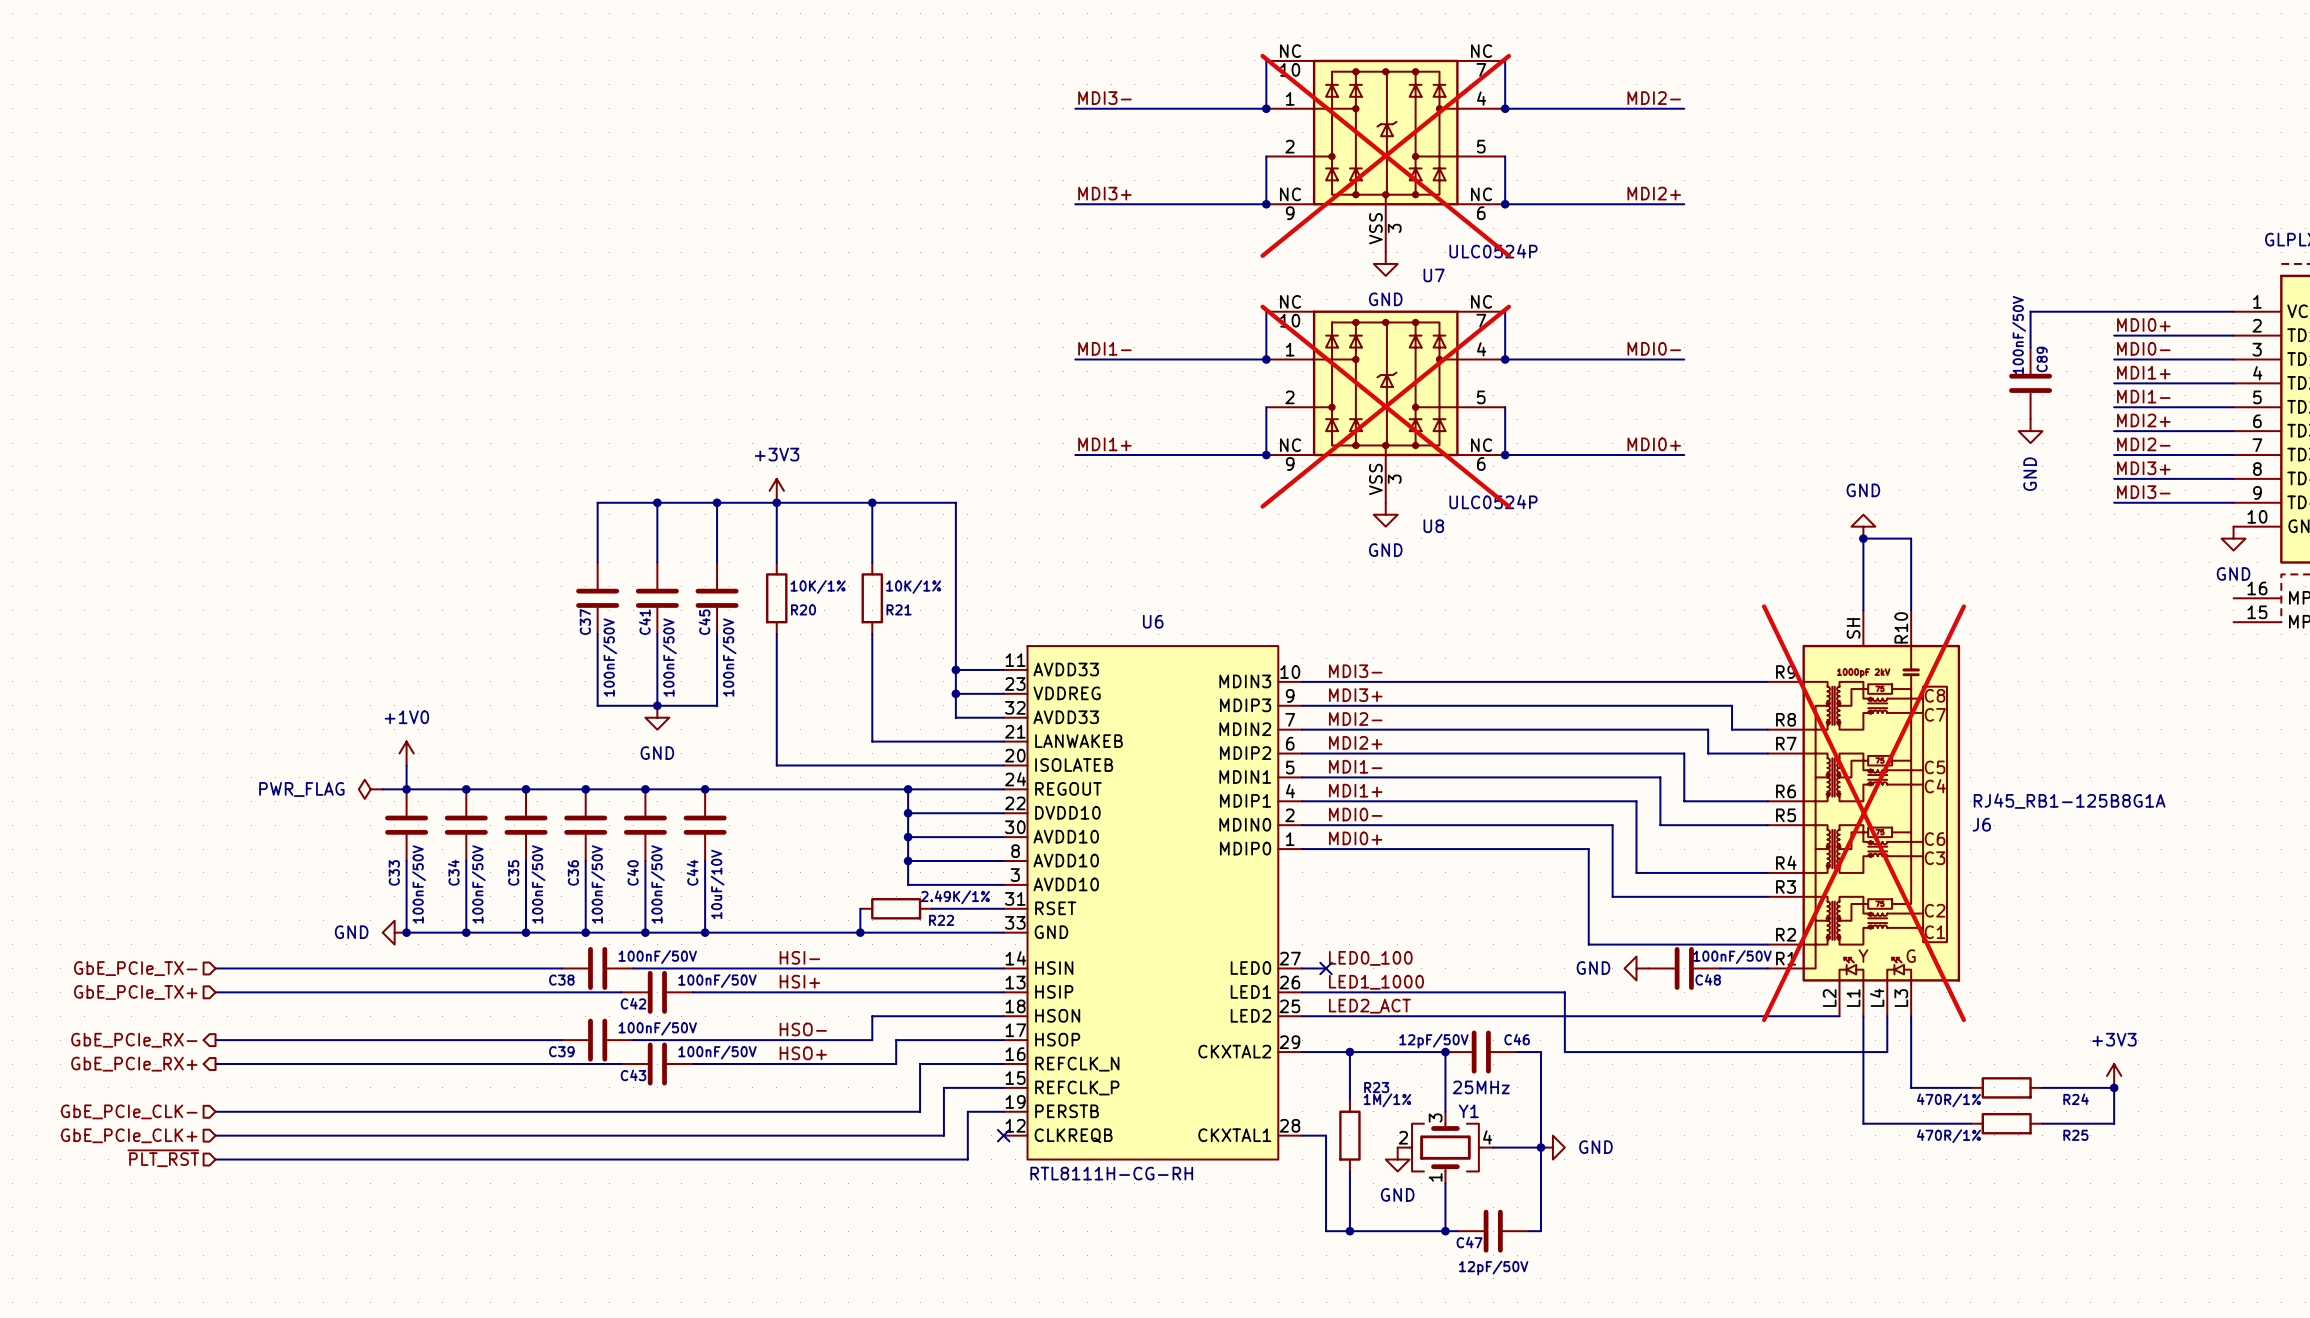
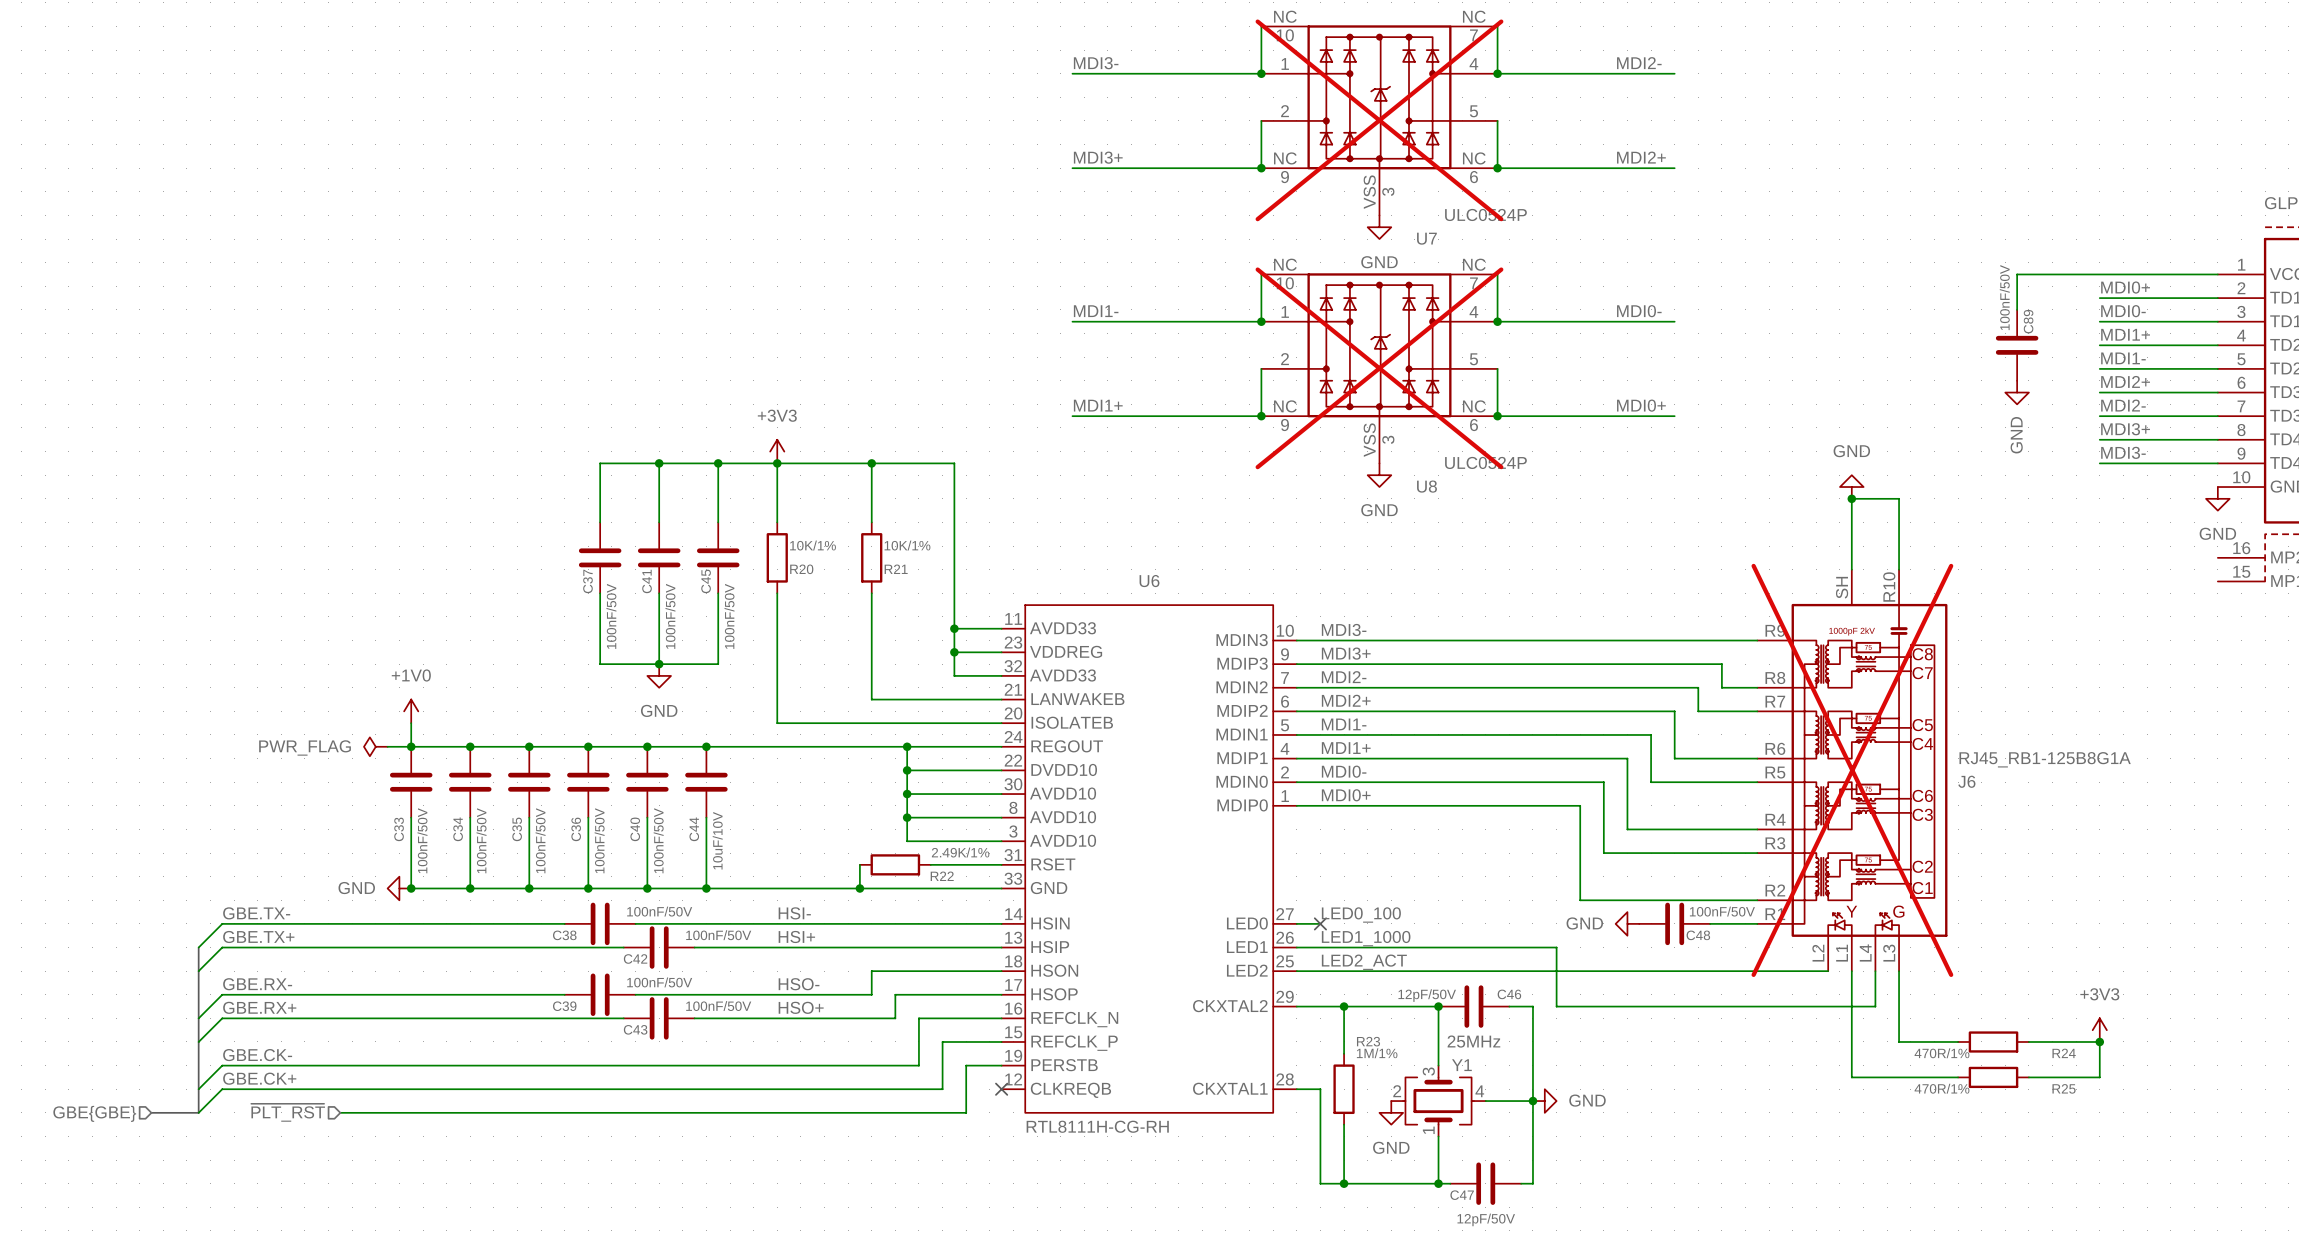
label: none -> GBE.TX- (256, 913)
hierarchical label: GbE_PCIe_TX- (135, 968) -> none
wire: none -> (222, 923) (198, 947)
label: none -> GBE.TX+ (258, 936)
hierarchical label: GbE_PCIe_TX+ (135, 992) -> none
bus: none -> (198, 947) (198, 1112) (151, 1112)
wire: none -> (222, 947) (198, 971)
label: none -> GBE.RX- (257, 984)
hierarchical label: GbE_PCIe_RX- (134, 1040) -> none
wire: none -> (222, 994) (198, 1018)
label: none -> GBE.RX+ (259, 1007)
hierarchical label: GbE_PCIe_RX+ (134, 1064) -> none
wire: none -> (222, 1018) (198, 1041)
label: none -> GBE.CK- (257, 1055)
hierarchical label: GbE_PCIe_CLK- (129, 1111) -> none
wire: none -> (222, 1065) (198, 1089)
label: none -> GBE.CK+ (259, 1078)
hierarchical label: GbE_PCIe_CLK+ (129, 1135) -> none
wire: none -> (222, 1089) (198, 1112)
hierarchical label position: ~{PLT_RST} (163, 1158) -> ~{PLT_RST} (288, 1112)
wire: (215, 1159) (334, 1159) -> none
hierarchical label: none -> GBE{GBE} (94, 1113)

